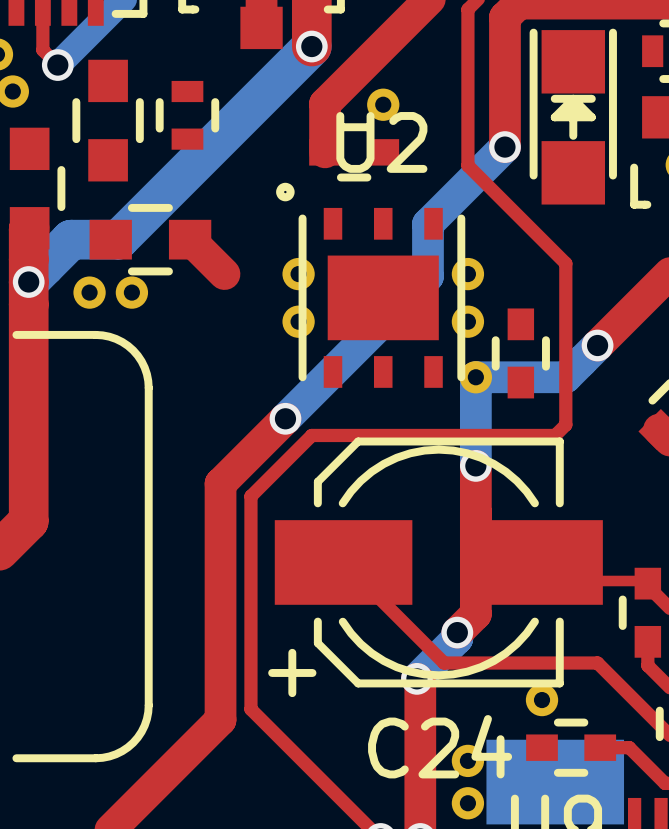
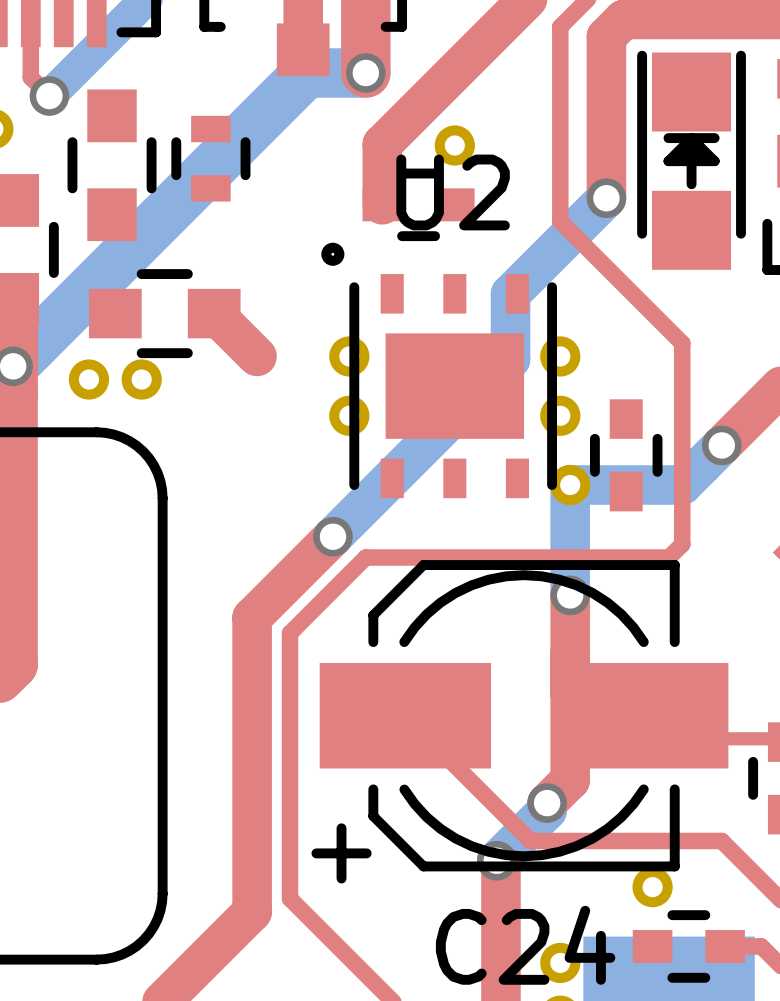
bottom track: (311, 46) (118, 239) (71, 239) -> (365, 72) (306, 72) (65, 313)

